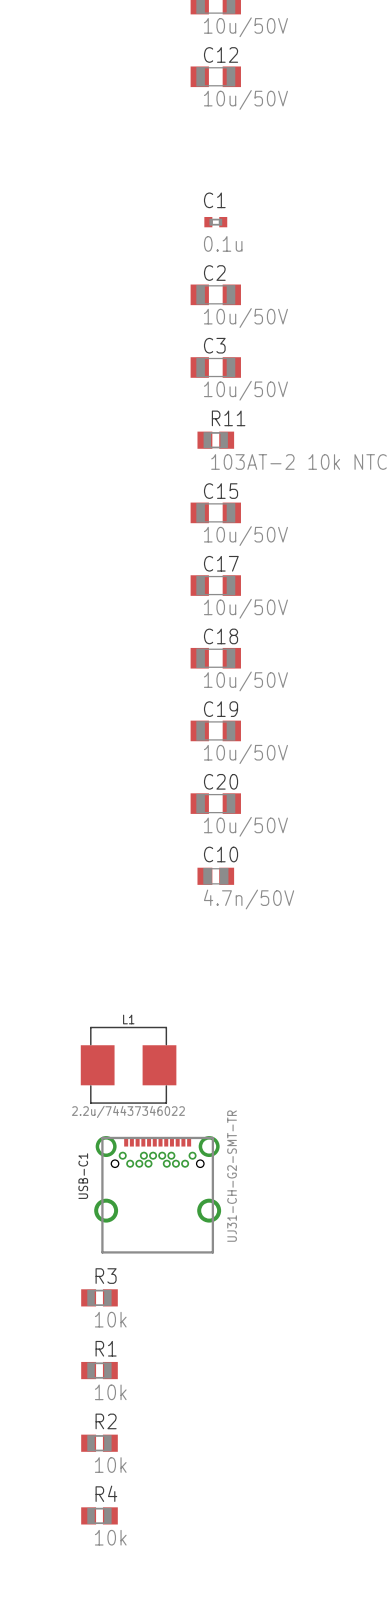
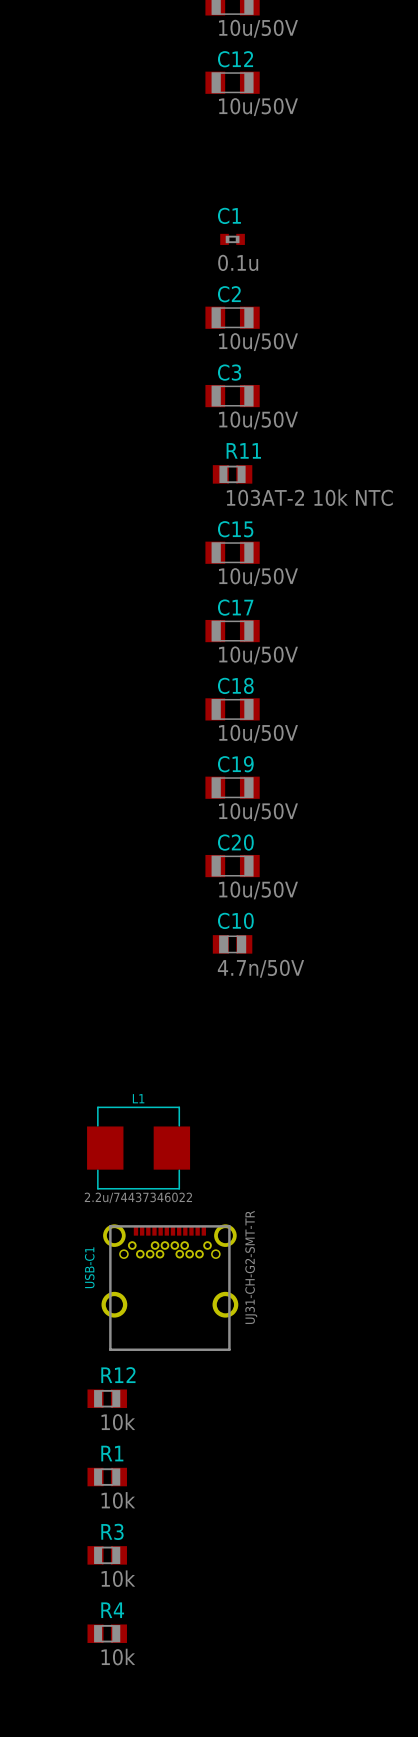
R3 name: R3 (106, 1276) -> R12 (118, 1375)
R2 name: R2 (106, 1421) -> R3 (112, 1531)

